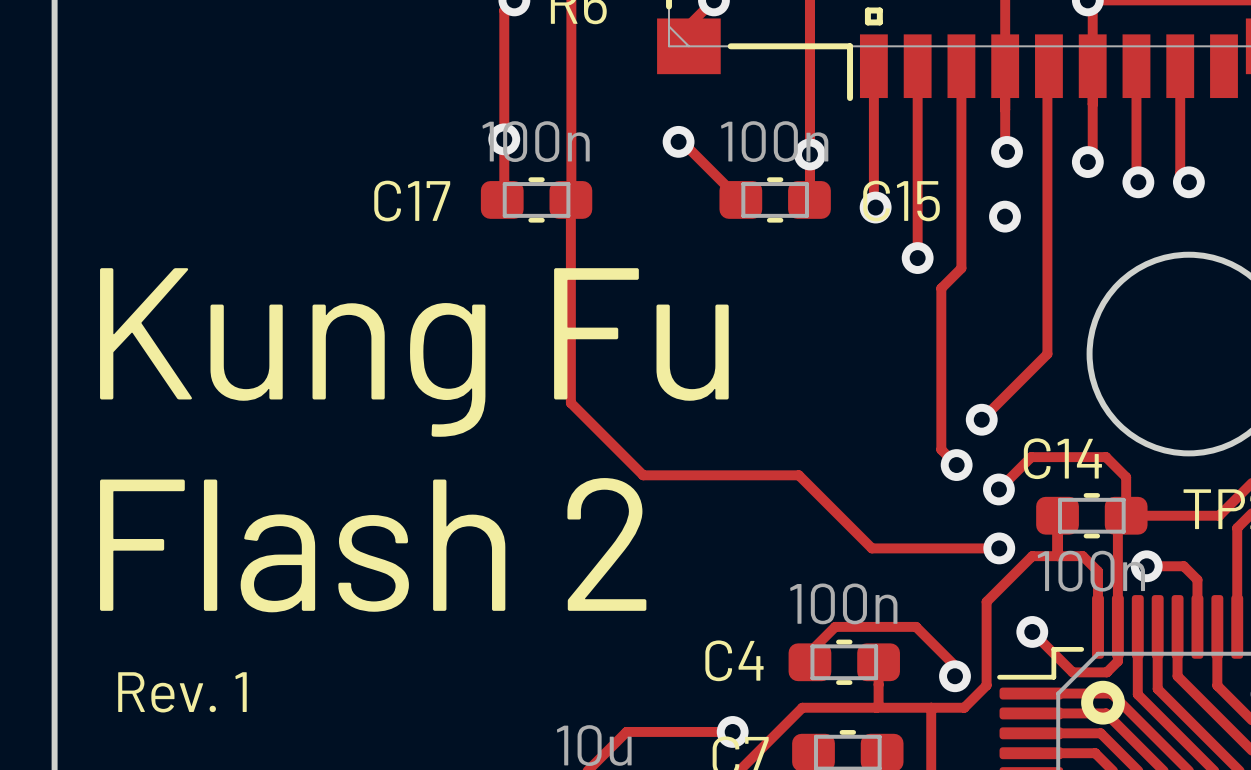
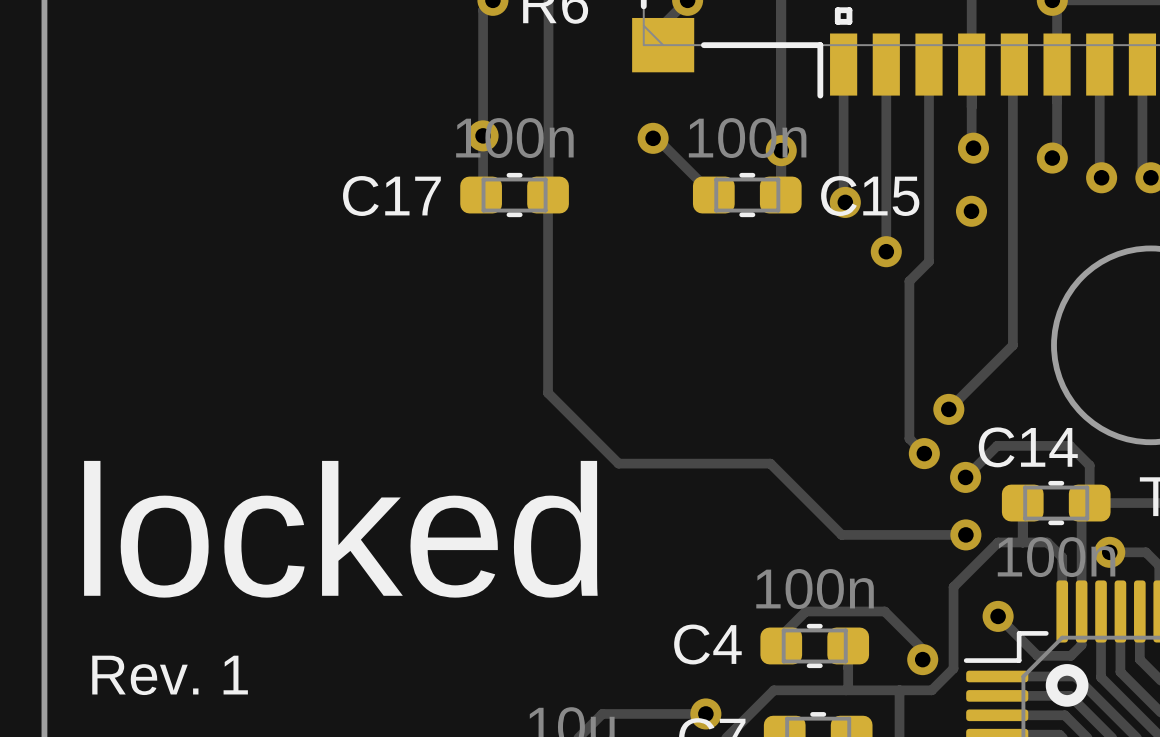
text: Kung Fu (414, 352) -> none
text: Flash 2 (373, 545) -> locked (340, 529)

